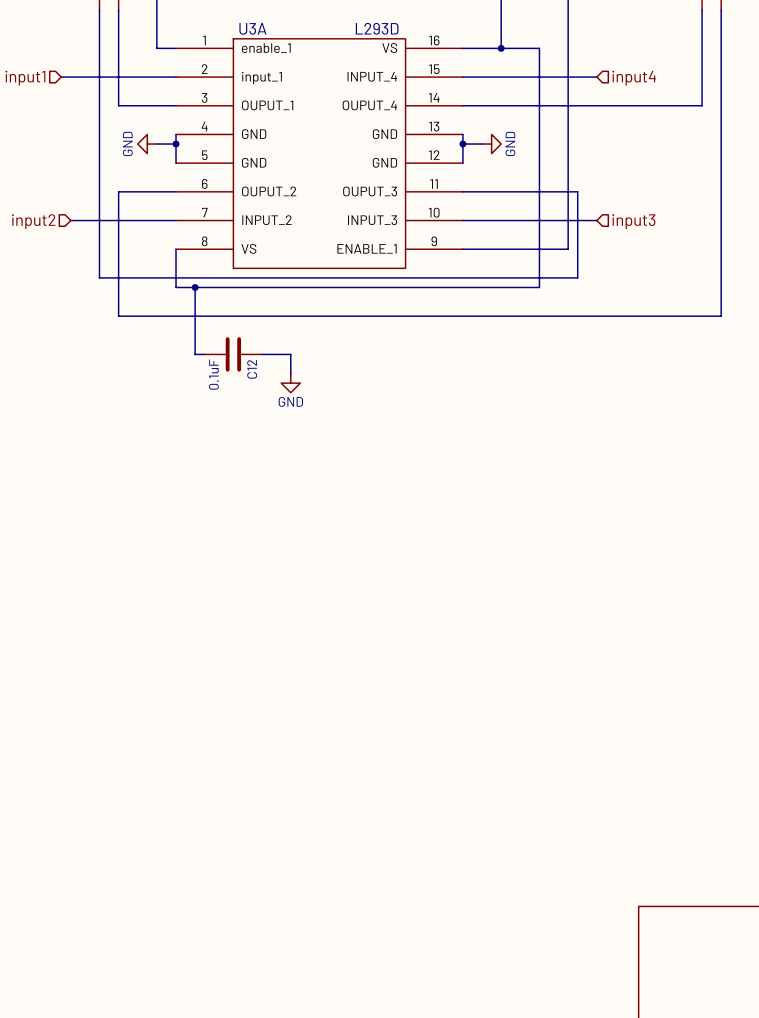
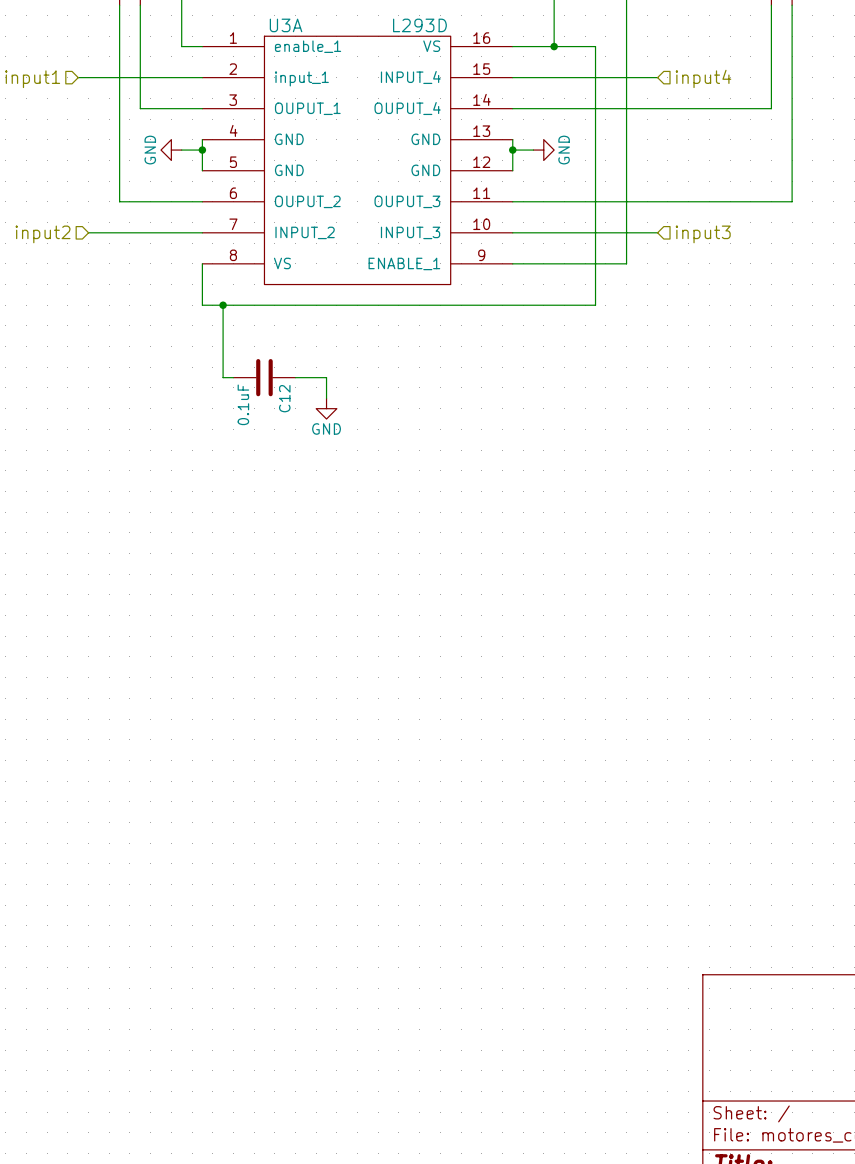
wire: (99, 191) (99, 277) (577, 277) (577, 191) -> (119, 201) (140, 201)
wire: (118, 191) (118, 316) (721, 316) (721, 191) -> (636, 201) (792, 201)

